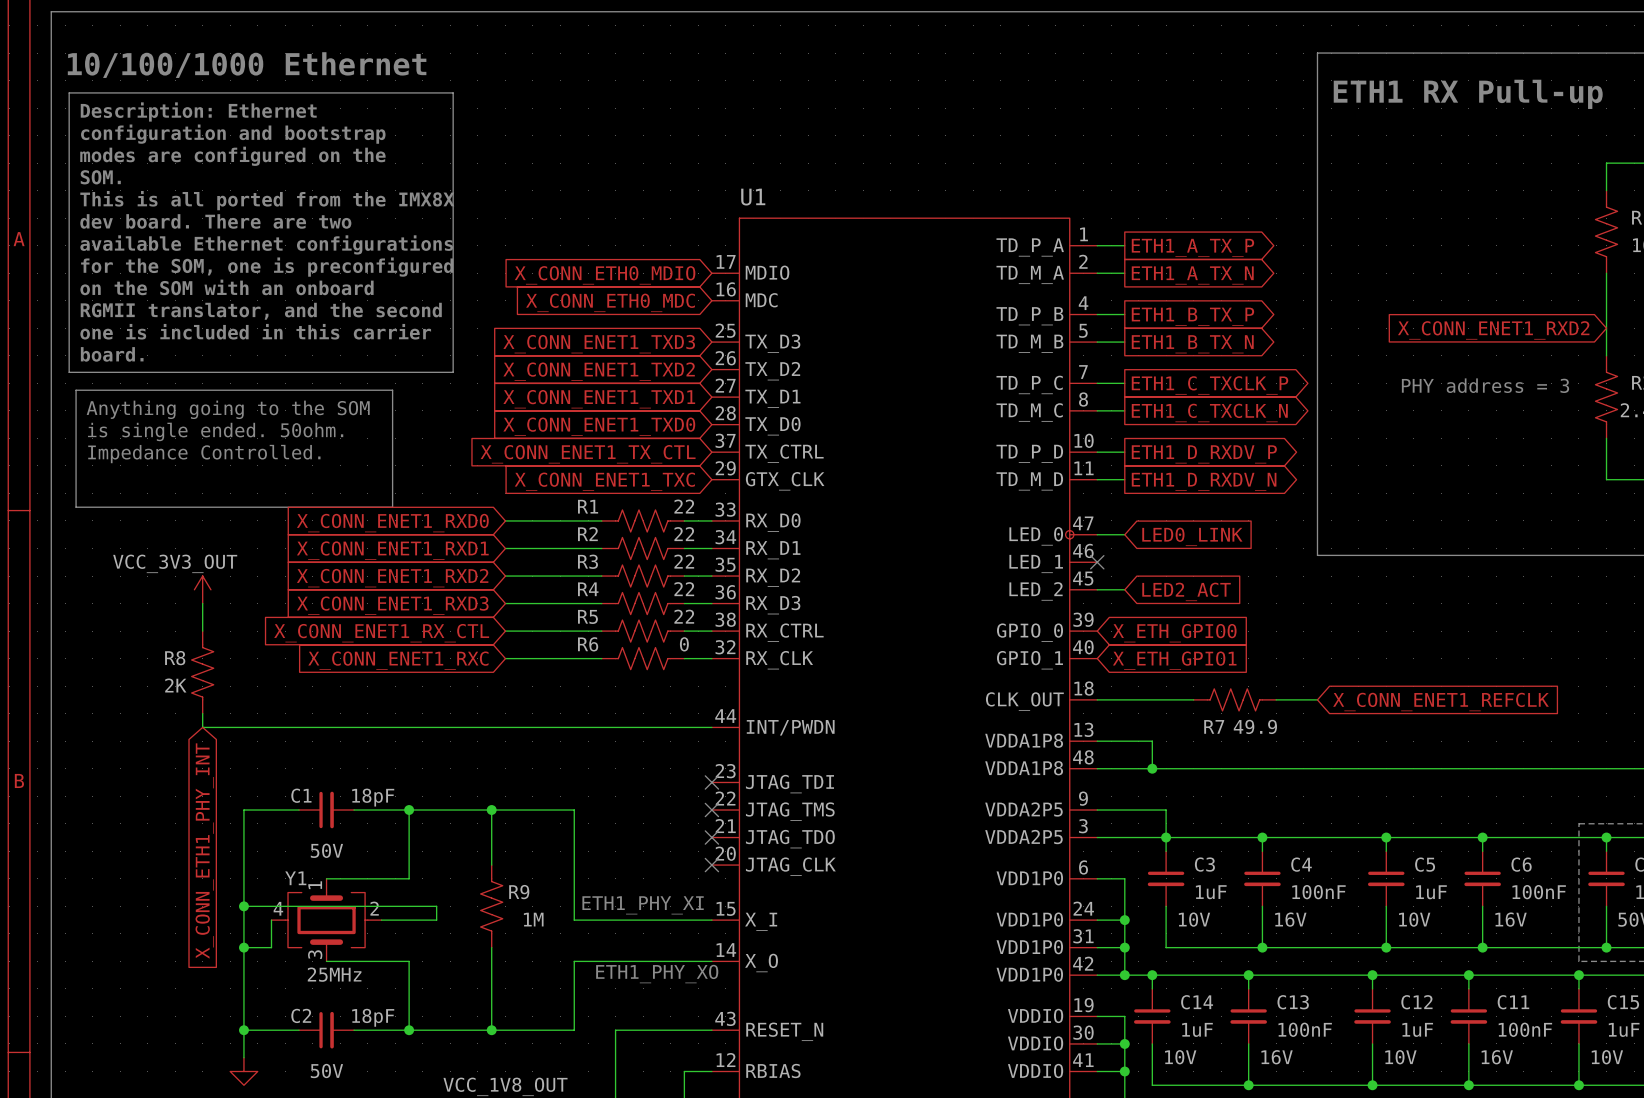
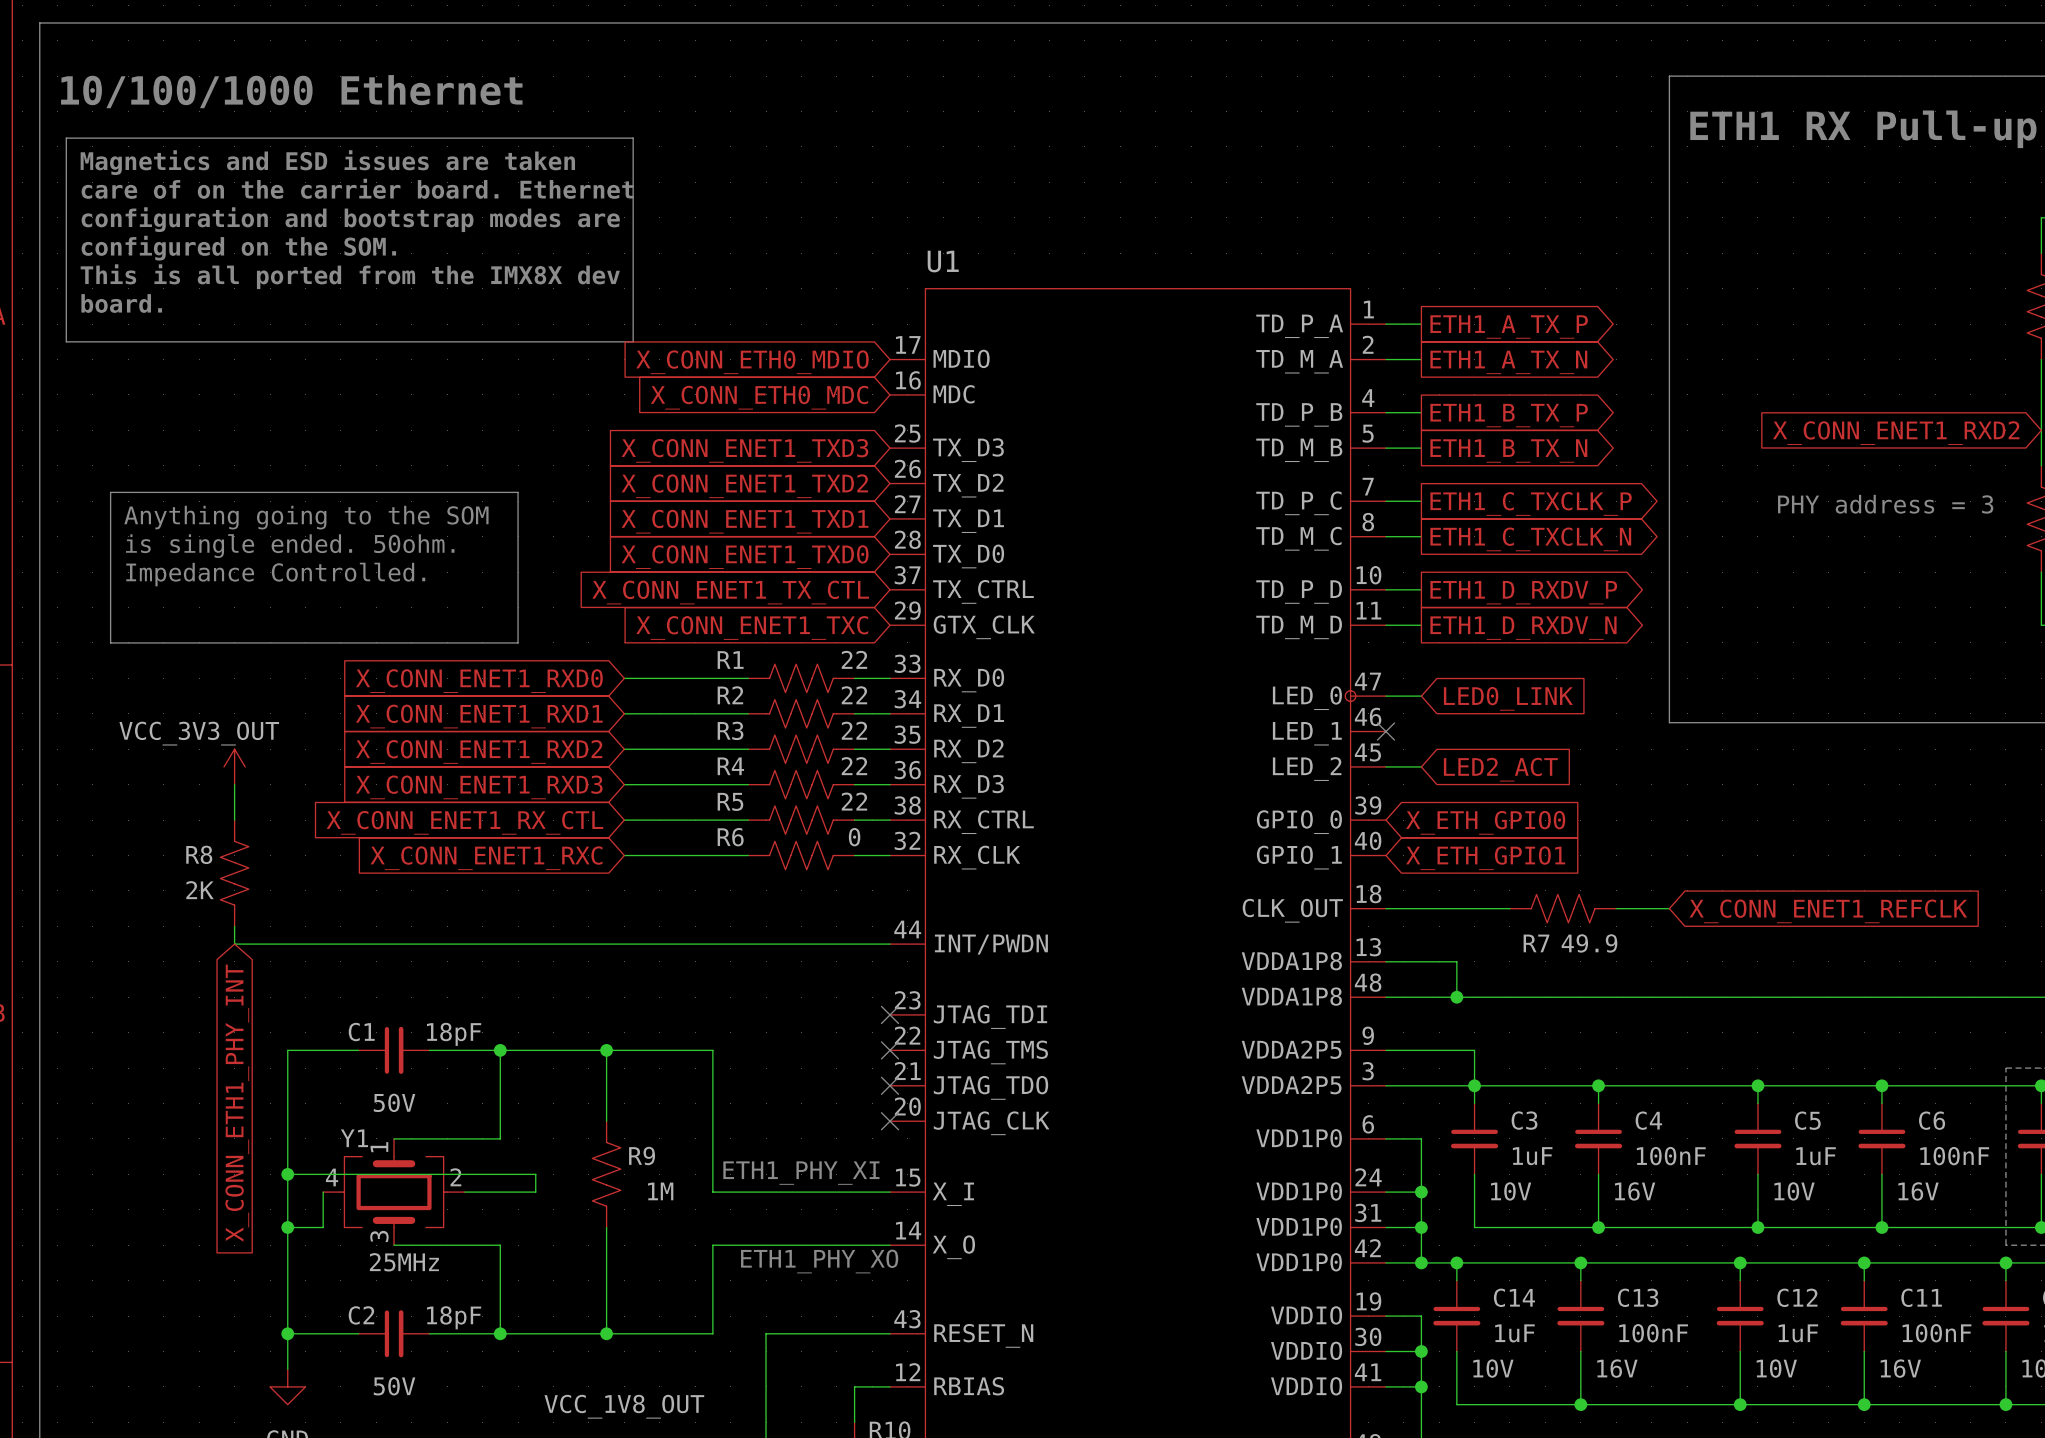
line: (69, 92) (453, 92) (453, 372) (69, 372) (69, 92) -> (66, 138) (66, 341) (633, 341) (633, 138) (66, 138)
text: Description: Ethernet (198, 111) -> none
text: none -> Magnetics and ESD issues are taken (327, 162)
text: configuration and bootstrap (233, 134) -> none
text: none -> care of on the carrier board. Ethernet (357, 188)
text: modes are configured on the (232, 156) -> none
text: none -> configuration and bootstrap modes are (350, 219)
text: SOM. (100, 177) -> none
text: none -> configured on the SOM. (238, 248)
text: This is all ported from the IMX8X (267, 200) -> This is all ported from the IMX8X dev (350, 276)
text: dev board. There are two (215, 221) -> none
text: available Ethernet configurations (266, 244) -> none
text: for the SOM, one is preconfigured (267, 267) -> none
text: on the SOM with an onboard (227, 287) -> none
text: RGMII translator, and the second (261, 311) -> none
text: one is included in this carrier (255, 331) -> none
text position: board. (112, 354) -> board. (121, 303)
line: (76, 390) (392, 390) (392, 507) (76, 507) (76, 390) -> (110, 492) (518, 492) (518, 642) (110, 642) (110, 492)
text position: Anything going to the SOM (228, 409) -> Anything going to the SOM (306, 517)
text position: is single ended. 50ohm. (215, 431) -> is single ended. 50ohm. (290, 546)
text position: Impedance Controlled. (204, 454) -> Impedance Controlled. (275, 574)

